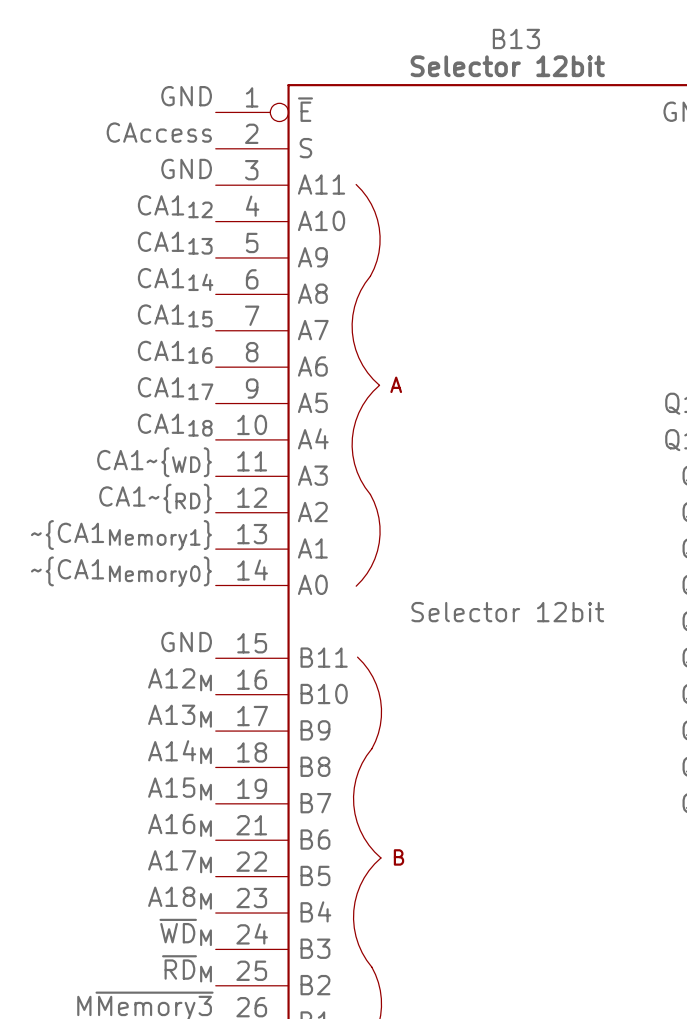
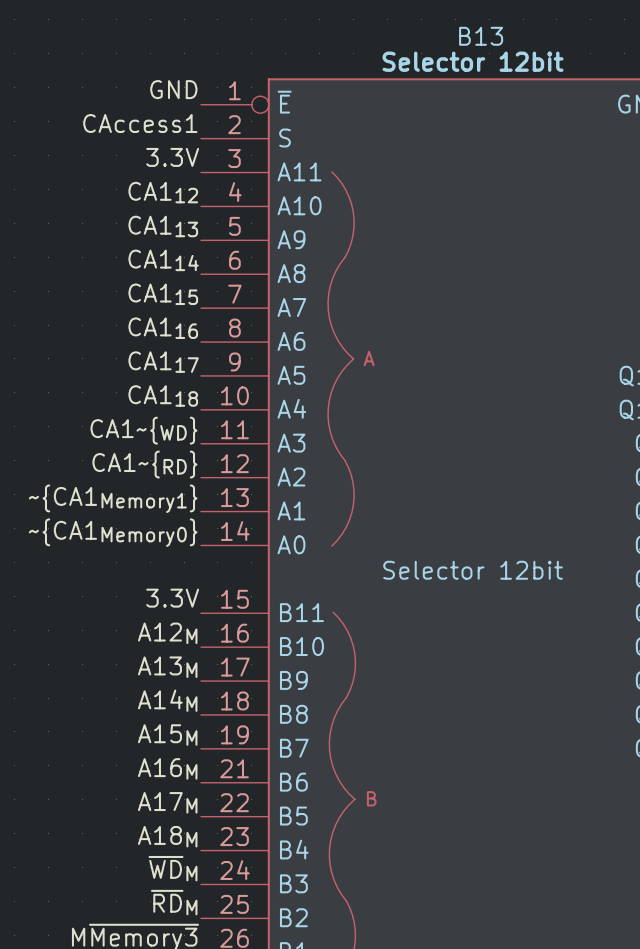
label: CAccess (159, 132) -> CAccess1 (140, 123)
label: GND (186, 168) -> 3.3V (172, 157)
label: GND (186, 642) -> 3.3V (172, 598)

